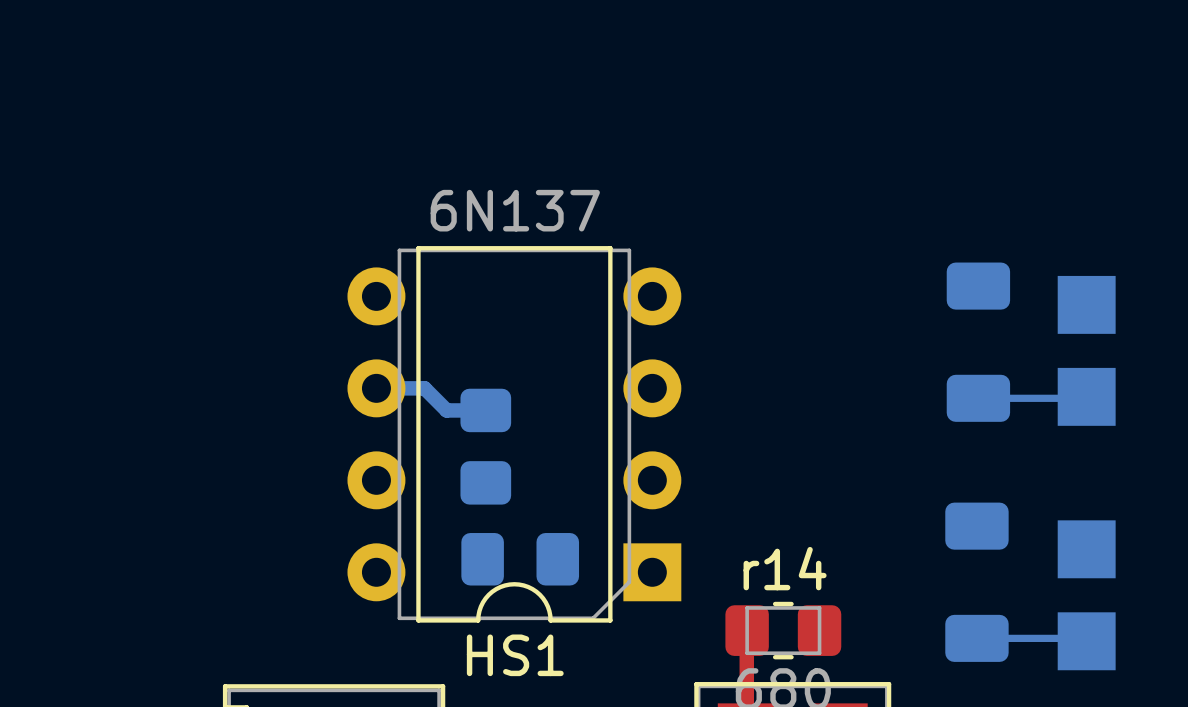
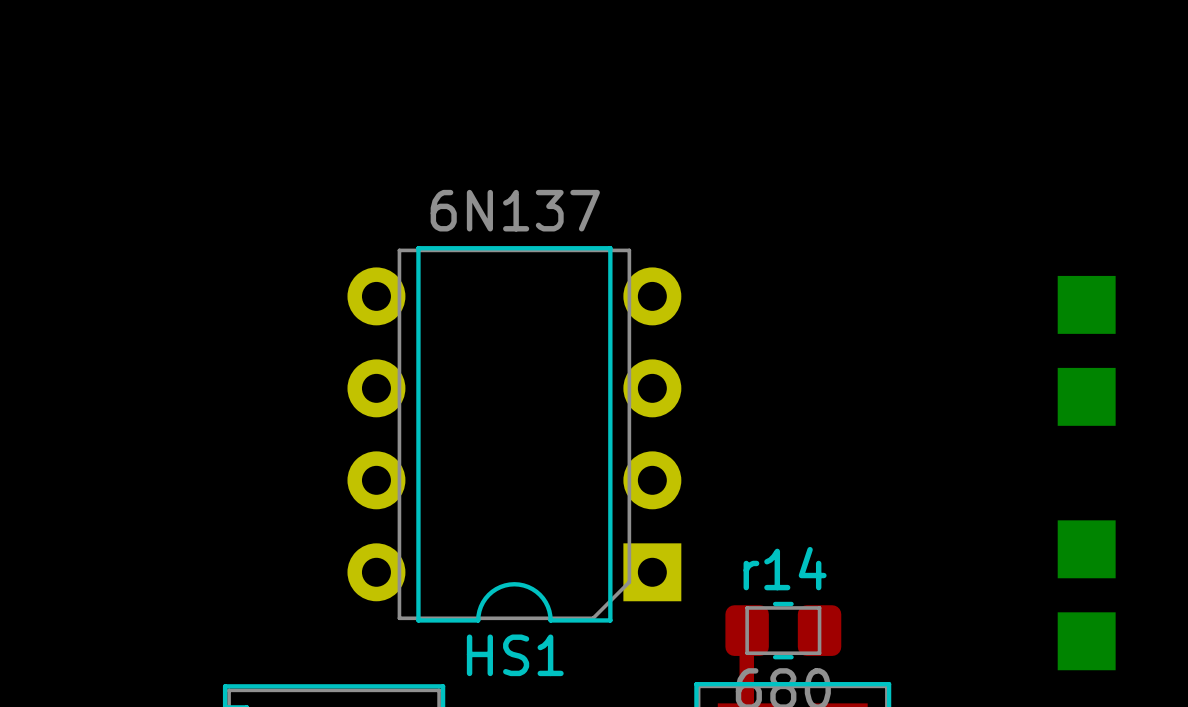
part: (978, 342) -> none
bottom track: (376, 388) (424, 388) (446, 410) (485, 410) -> none
bottom track: (1086, 396) (978, 398) -> none
part: (485, 446) -> none
part: (520, 559) -> none
part: (976, 582) -> none
bottom track: (976, 638) (1083, 638) (1086, 641) -> none

